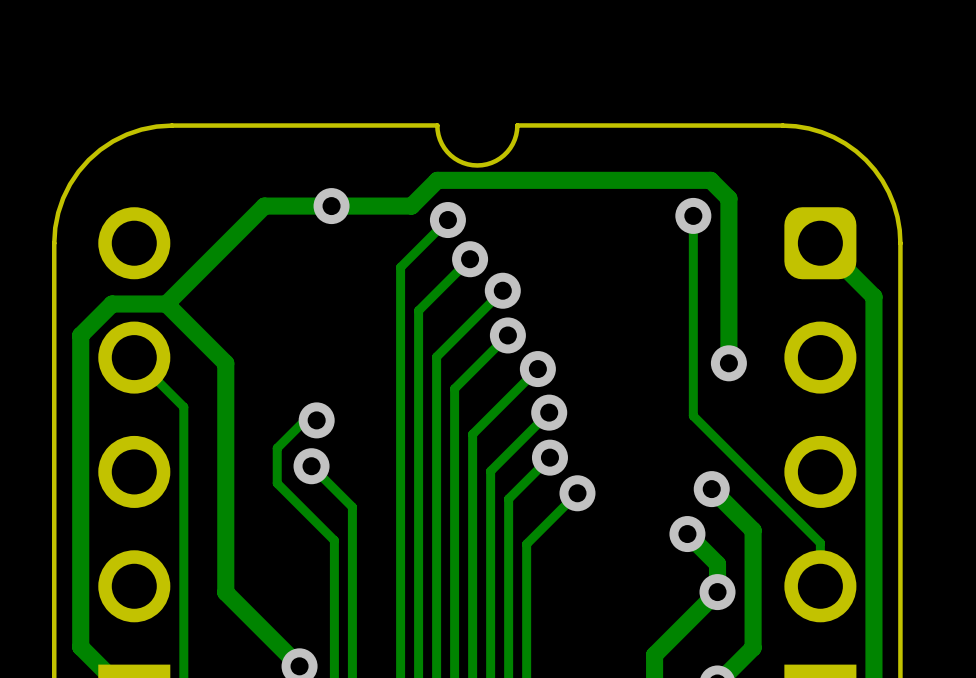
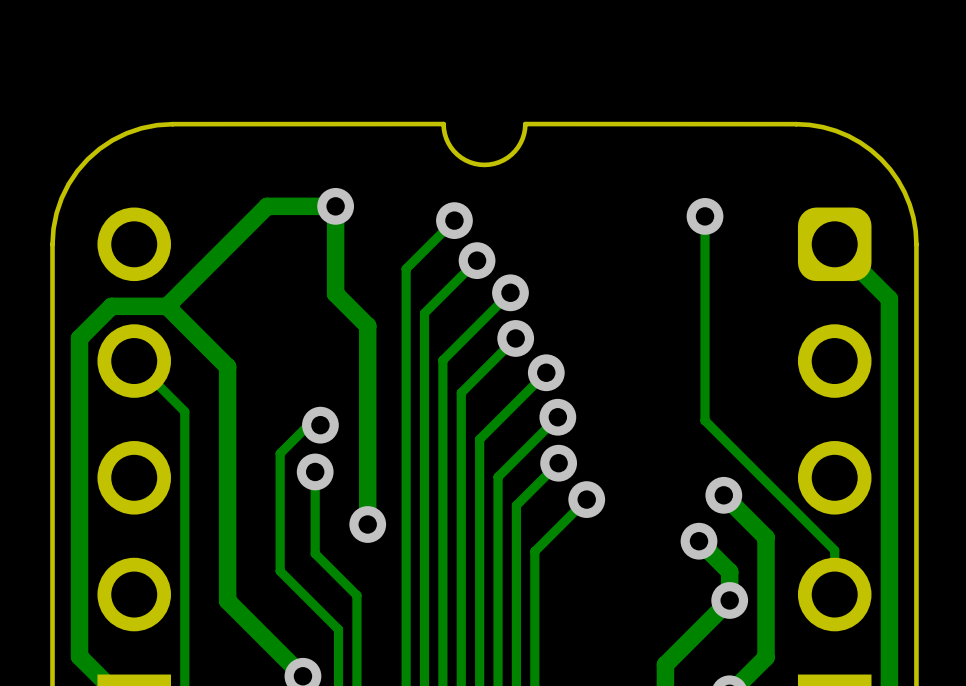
track: (331, 206) (411, 206) (437, 180) (710, 180) (728, 198) (728, 363) -> (335, 206) (335, 293) (367, 326) (367, 524)
via: (728, 363) -> none
track: (311, 466) (352, 507) (352, 587) -> (315, 471) (315, 553) (356, 595)
track: (277, 483) (334, 540) (334, 620) -> (280, 489) (280, 571) (338, 629)
via: none -> (367, 524)

